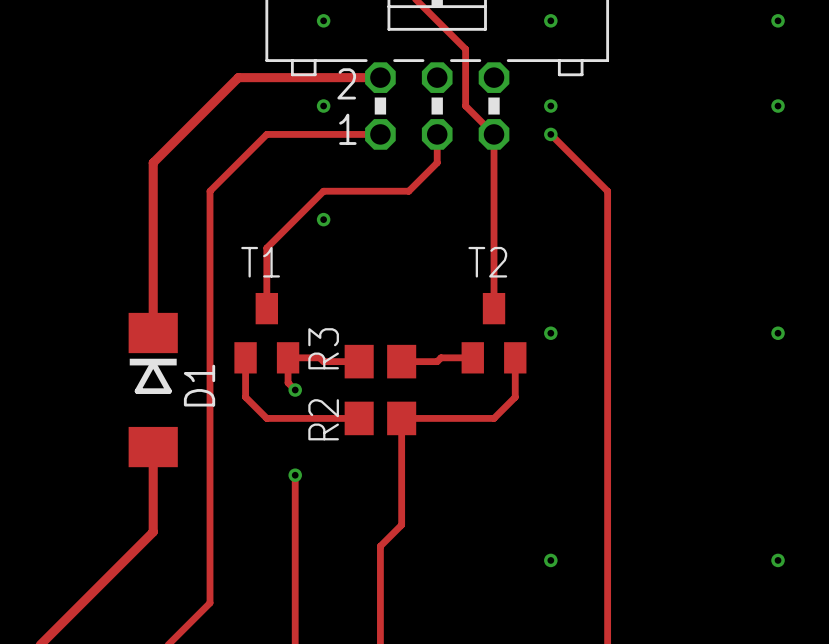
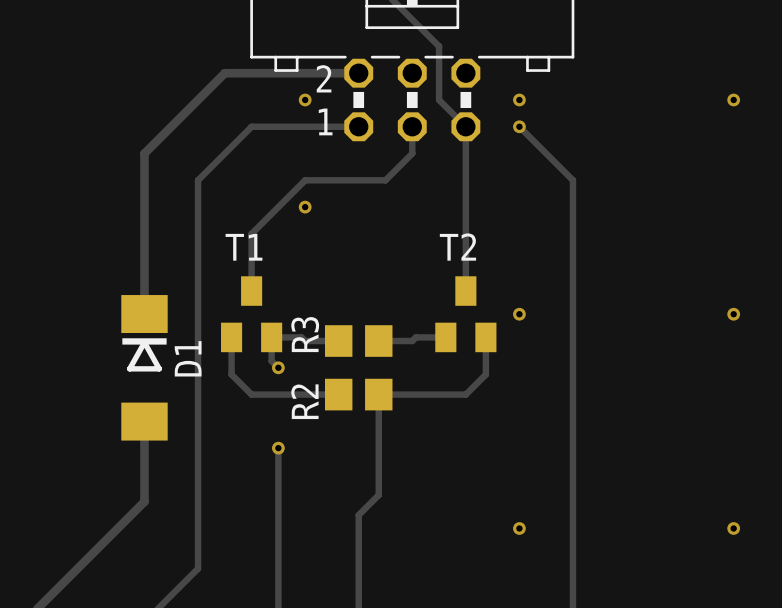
via: (323, 20) -> none
via: (550, 20) -> none
via: (778, 20) -> none

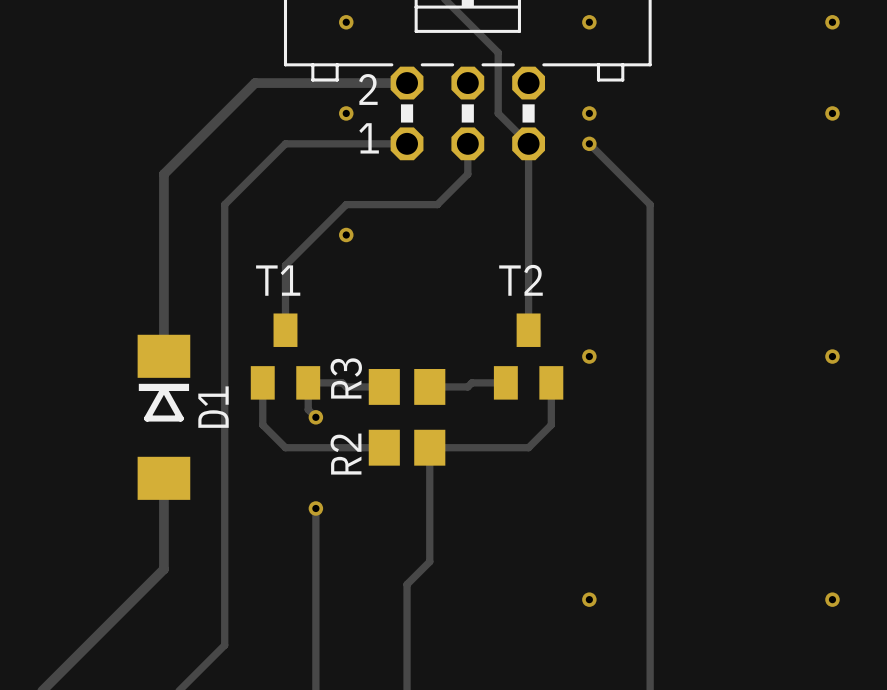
via: none -> (346, 22)
via: none -> (589, 22)
via: none -> (832, 22)

